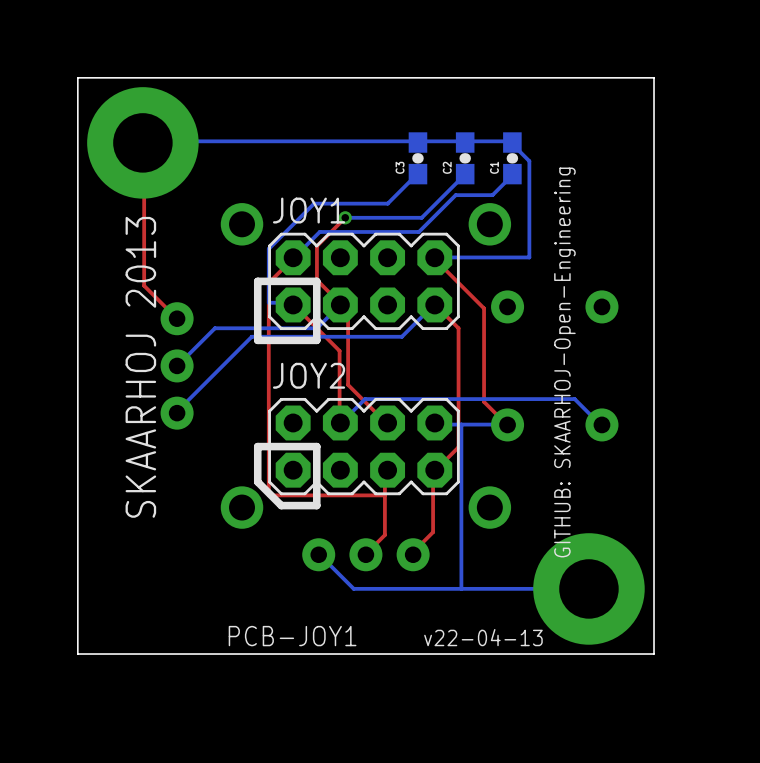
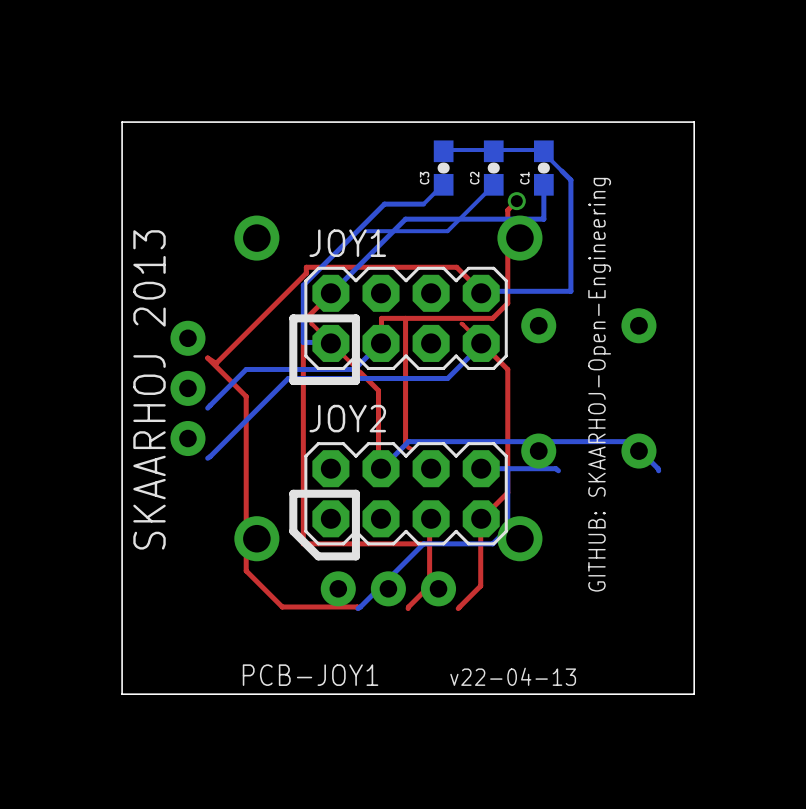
board edge: (654, 115) (654, 77) (77, 77) (77, 654) (115, 654) -> (694, 122) (122, 122) (122, 694)
top track: (142, 142) (144, 285) (177, 318) -> none
part: (142, 142) -> none
bottom track: (417, 142) (144, 141) (142, 142) -> none
bottom track: (529, 161) (529, 257) (434, 257) -> (561, 171) (570, 180) (570, 291) (483, 291) (481, 293)
bottom track: (512, 175) (492, 195) (455, 195) (418, 231) (319, 231) (293, 257) -> (543, 186) (543, 219) (405, 219) (330, 293)
top track: none -> (516, 201) (507, 210) (507, 303) (492, 318) (381, 318) (381, 343)
via: none -> (516, 201)
bottom track: (399, 192) (387, 203) (314, 203) (268, 248) (268, 302) (291, 302) (293, 304) -> (423, 204) (384, 204) (303, 285) (303, 342) (330, 343)
top track: (345, 217) (316, 246) (316, 280) (348, 311) (348, 384) (382, 418) -> (405, 318) (405, 444)
via: (345, 217) -> none
top track: (293, 257) (268, 282) (268, 495) (384, 495) -> none
top track: (434, 257) (484, 308) (484, 401) (507, 424) -> none
top track: none -> (330, 293) (303, 321) (303, 543) (429, 543)
top track: none -> (481, 293) (456, 267) (306, 267) (306, 273) (216, 363) (207, 358) (246, 396) (246, 570) (282, 606) (357, 606) (358, 608)
line: (316, 281) (316, 340) (257, 340) (257, 281) (316, 281) -> (355, 318) (355, 381) (293, 381) (293, 318) (355, 318)
JOY1 position: (363, 281) -> (406, 318)
bottom track: (340, 304) (316, 328) (214, 328) (177, 365) -> none
bottom track: (434, 304) (401, 336) (251, 336) (177, 413) -> none
bottom track: none -> (381, 343) (354, 369) (246, 369) (207, 408)
bottom track: none -> (481, 343) (447, 378) (288, 378) (207, 458)
top track: (458, 328) (458, 447) (433, 472) (433, 532) (413, 552) (413, 554) -> (486, 348) (507, 369) (507, 492) (480, 519) (480, 585) (458, 608)
top track: (339, 350) (340, 422) -> (360, 372) (378, 390) (378, 468) (381, 468)
bottom track: (340, 422) (365, 399) (574, 399) (601, 424) -> none
bottom track: (434, 422) (435, 424) (507, 424) -> none
bottom track: (461, 424) (461, 588) -> none
bottom track: none -> (381, 468) (408, 441) (631, 441) (658, 470)
bottom track: none -> (481, 468) (555, 468) (558, 470)
bottom track: none -> (507, 468) (507, 528) (492, 543) (423, 543) (358, 608)
JOY2 position: (363, 446) -> (406, 493)
top track: (387, 470) (384, 472) (384, 535) (365, 554) -> none
top track: none -> (431, 518) (429, 585) (408, 608)
line: (276, 500) (257, 481) (257, 446) (316, 446) (316, 505) (281, 505) -> (293, 531) (293, 493) (355, 493) (355, 556) (318, 556) (298, 536)
bottom track: (318, 554) (353, 588) (588, 588) -> none
part: (588, 588) -> none

